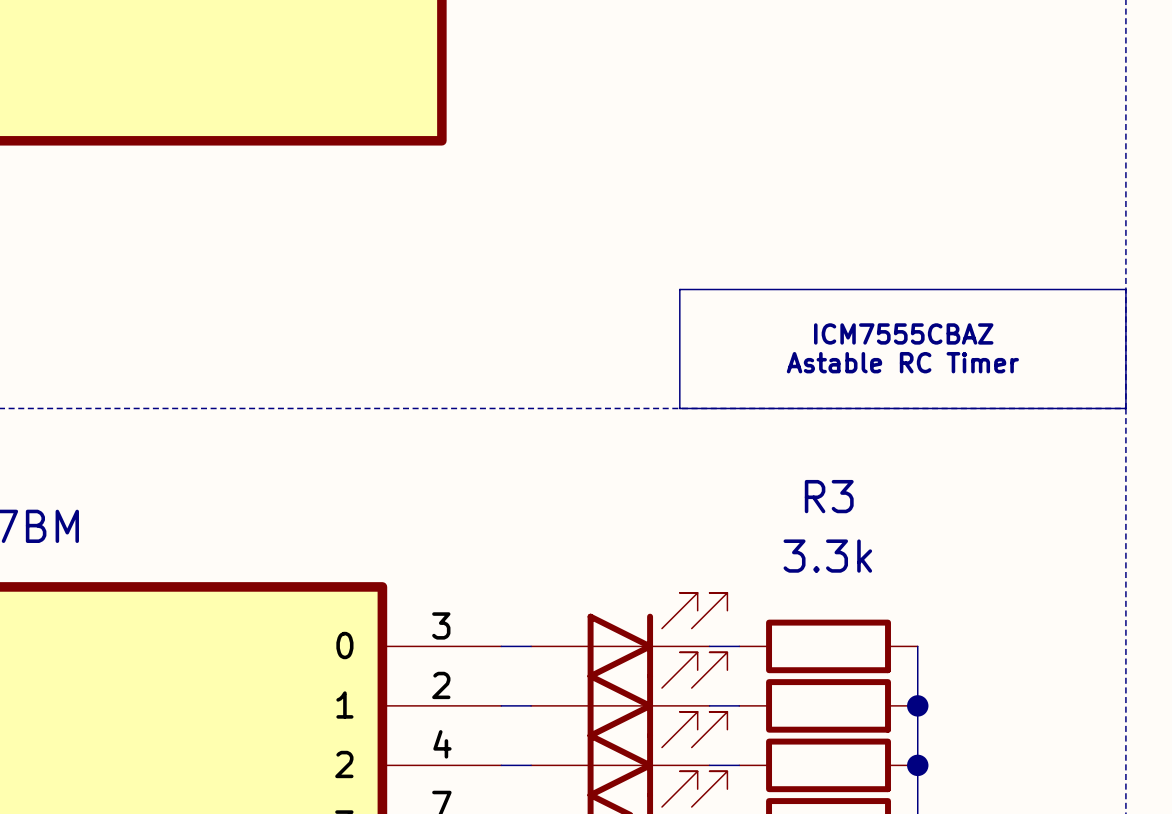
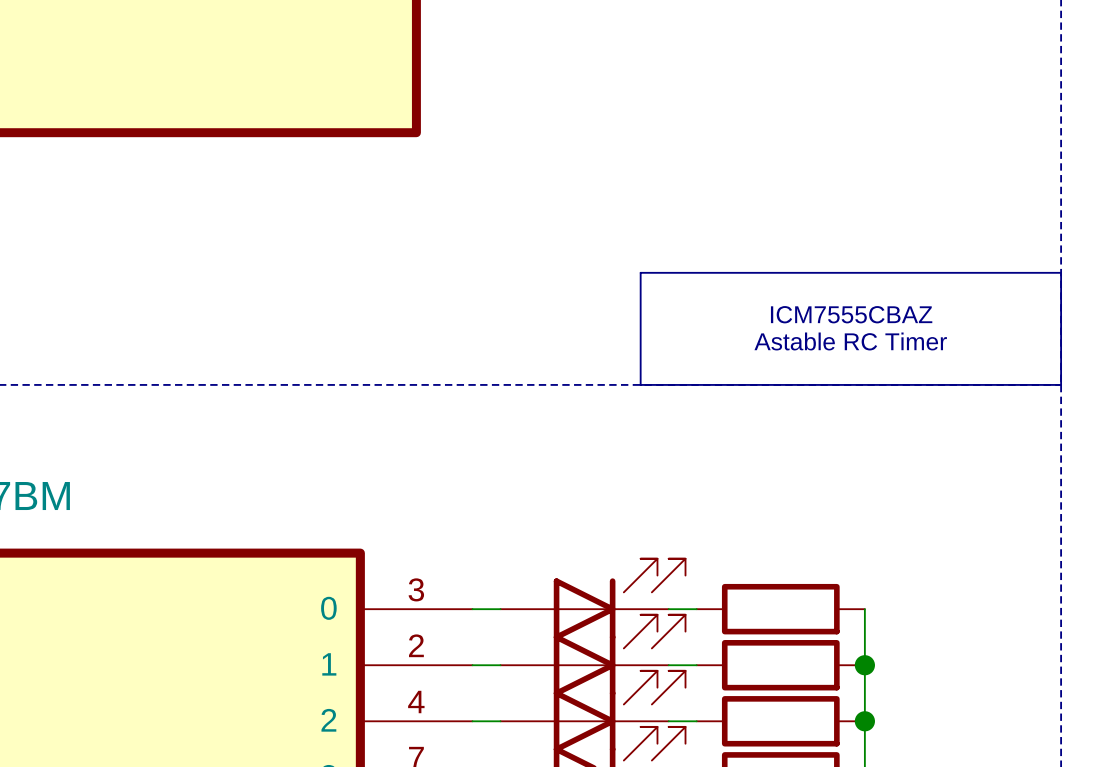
R3 name: R3 (829, 496) -> none
R3 value: 3.3k (827, 556) -> none

